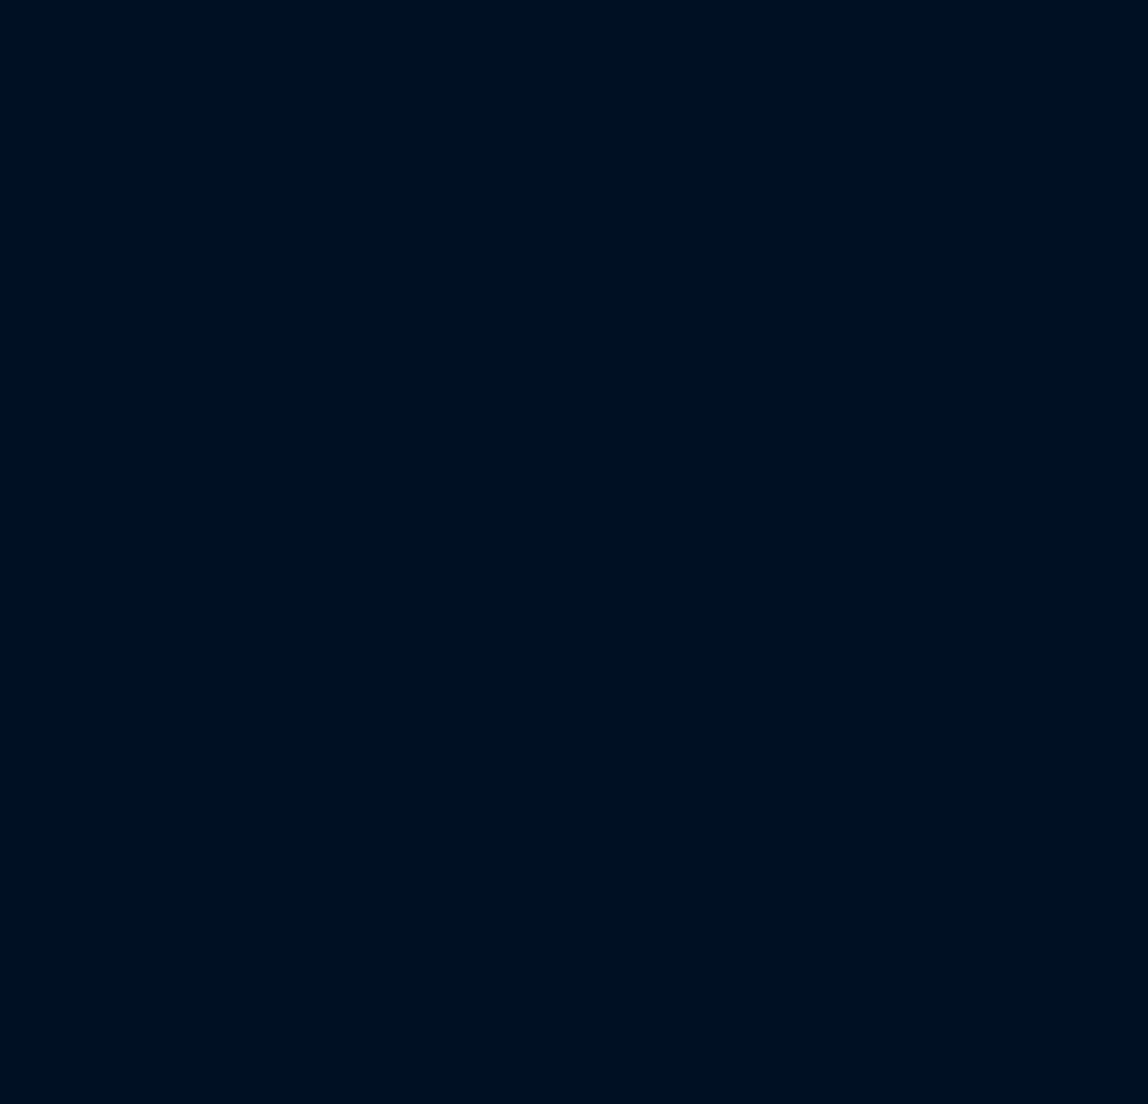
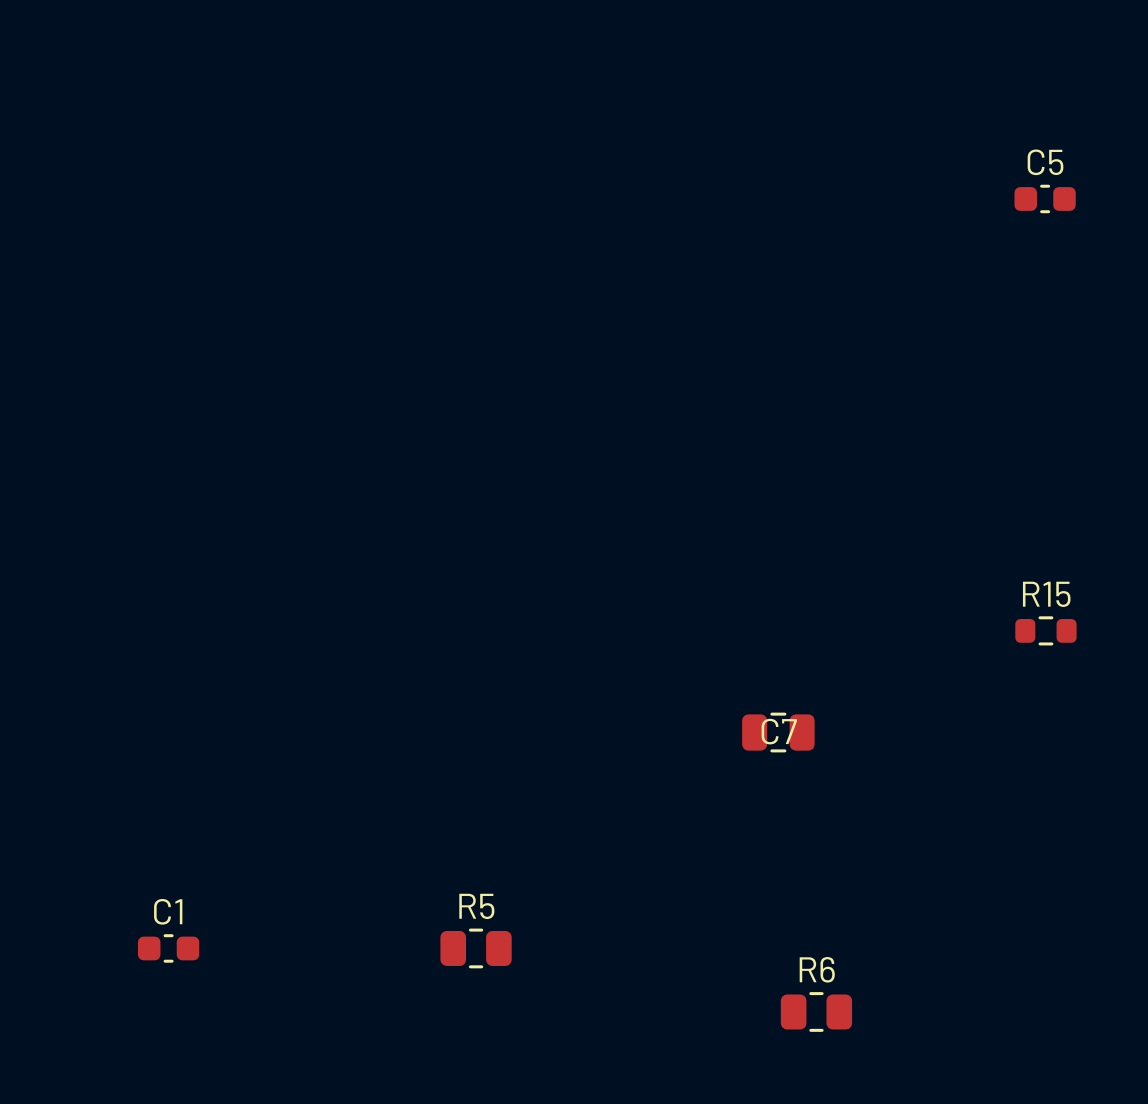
C5: none -> (1045, 198)
R15: none -> (1045, 630)
C7: none -> (778, 732)
C1: none -> (168, 948)
R5: none -> (476, 948)
R6: none -> (816, 1011)

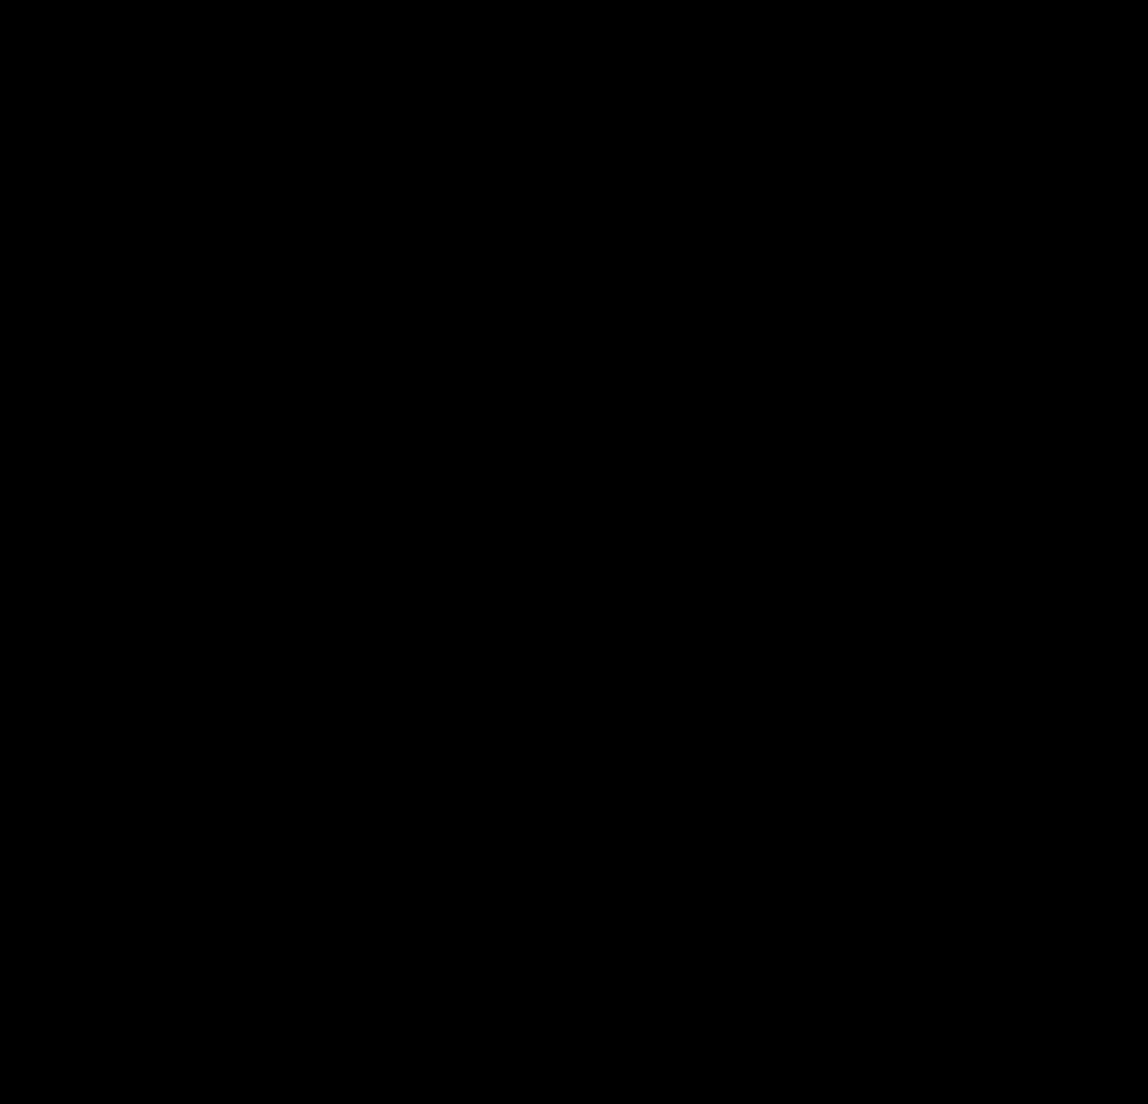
C5: (1045, 198) -> none
R15: (1045, 630) -> none
C7: (778, 732) -> none
C1: (168, 948) -> none
R5: (476, 948) -> none
R6: (816, 1011) -> none

